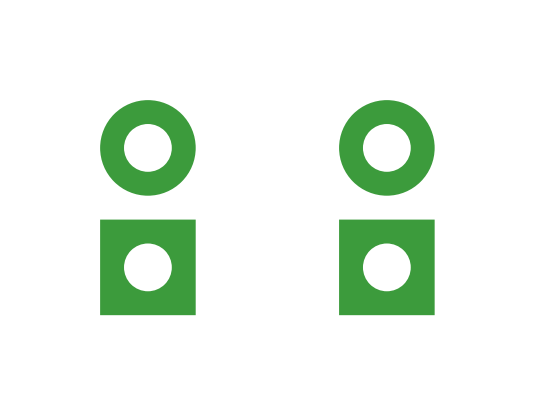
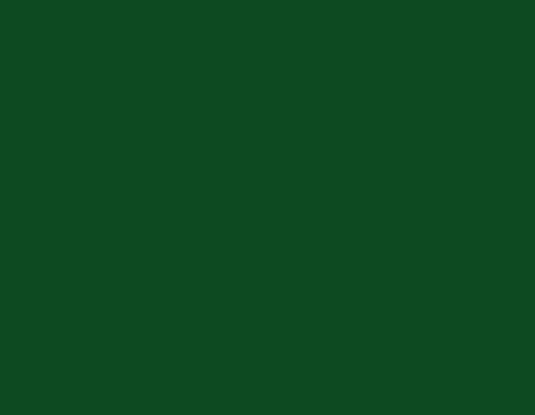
part: (147, 207) -> none
part: (386, 207) -> none

